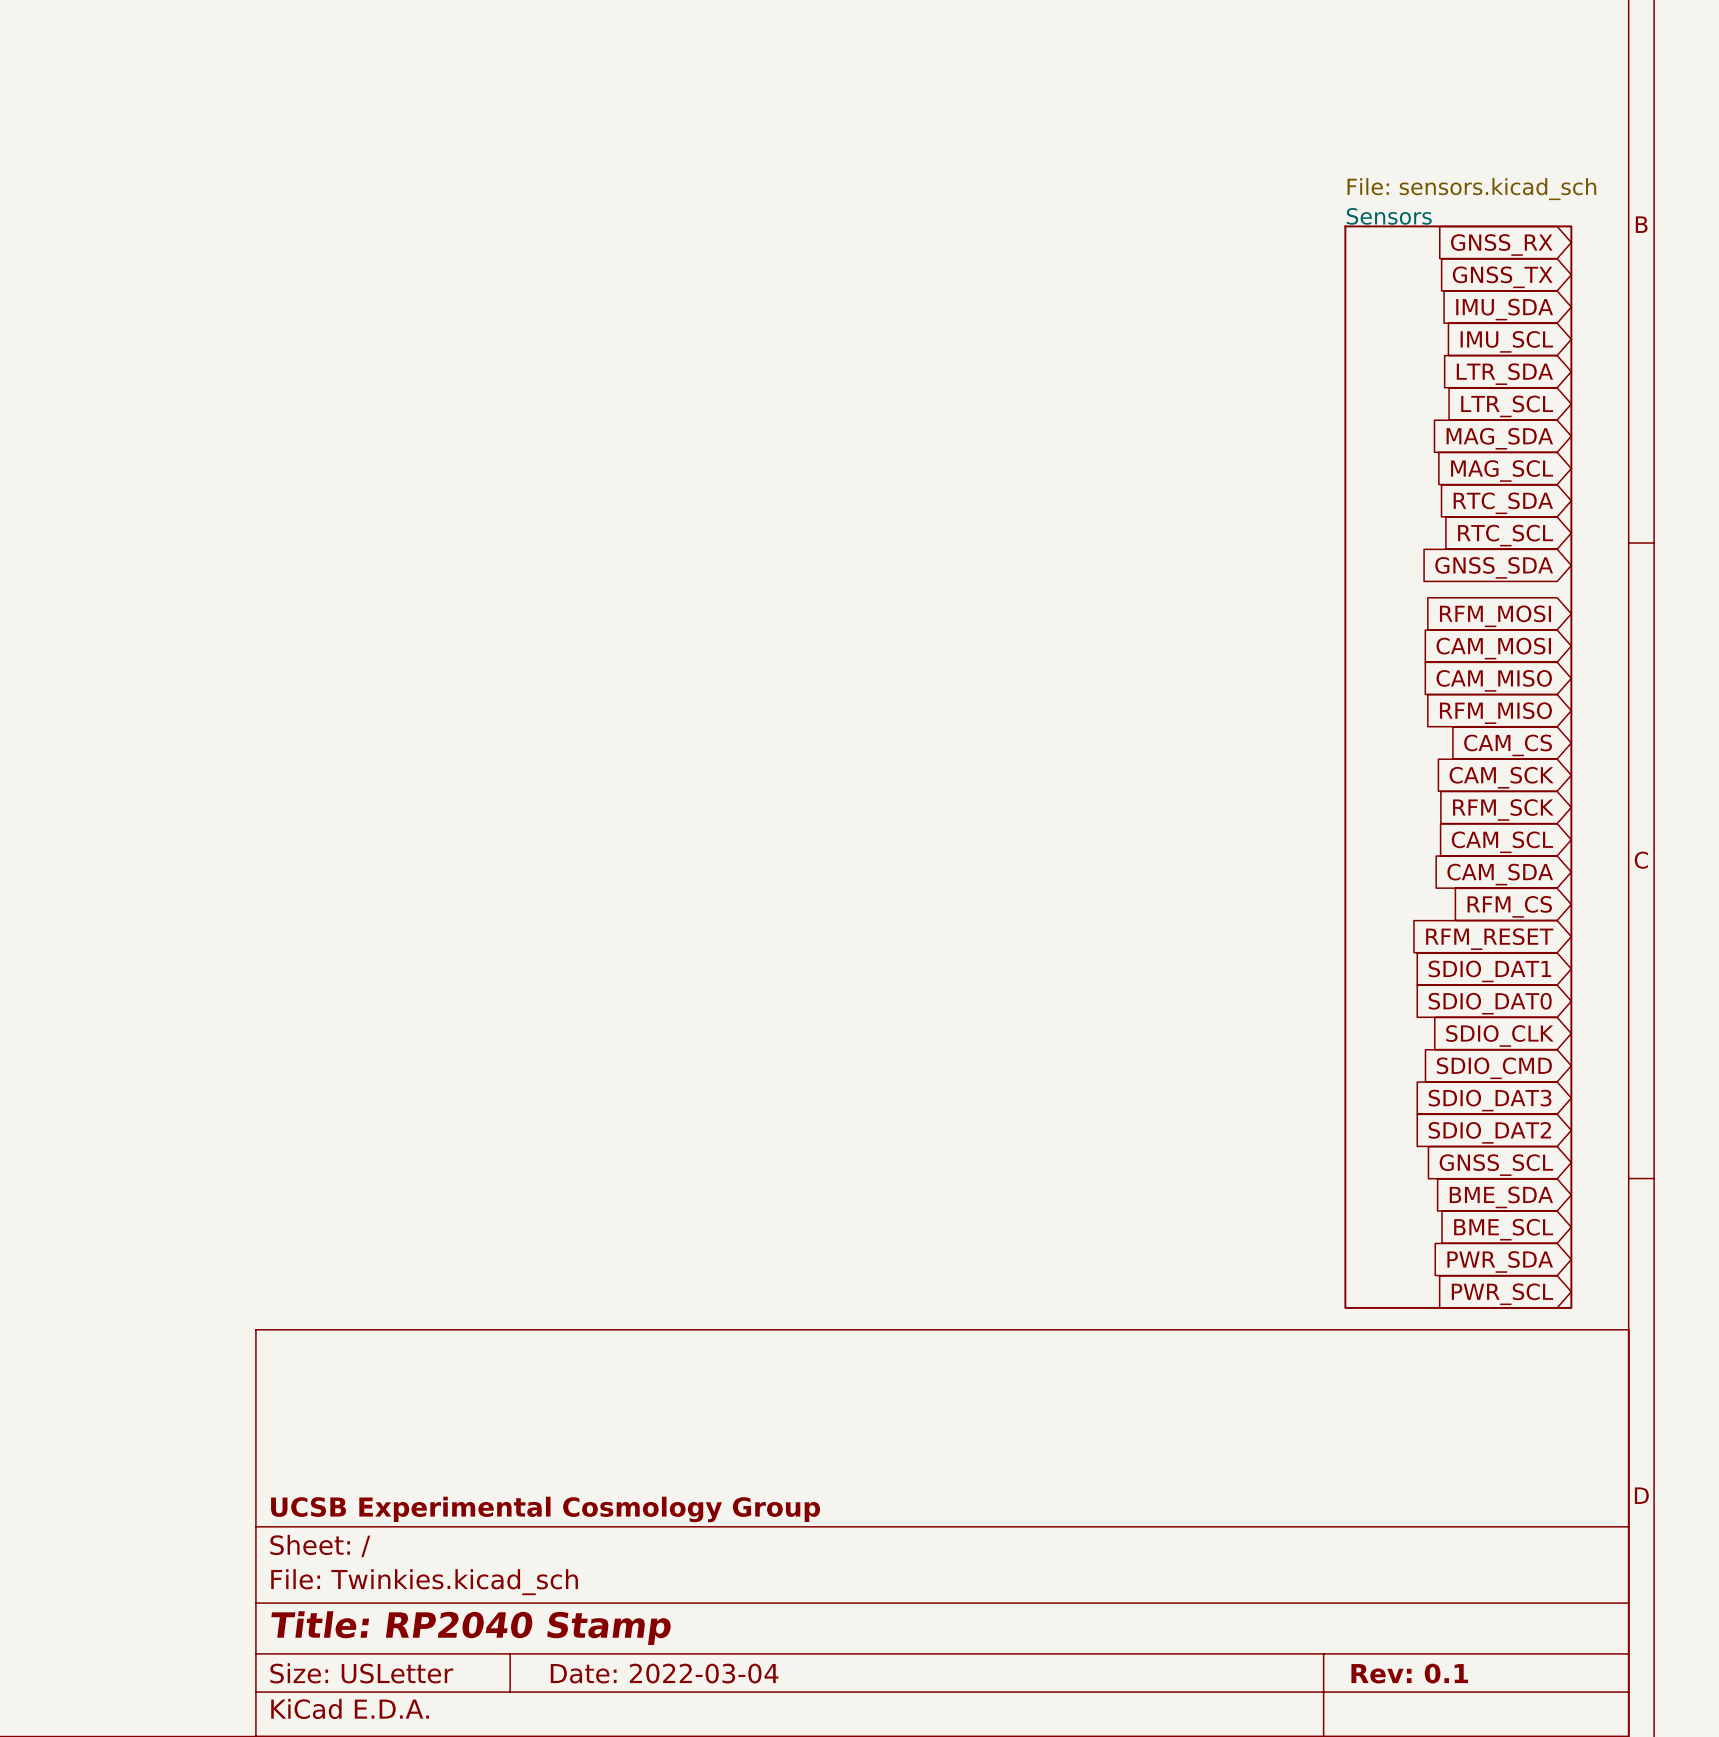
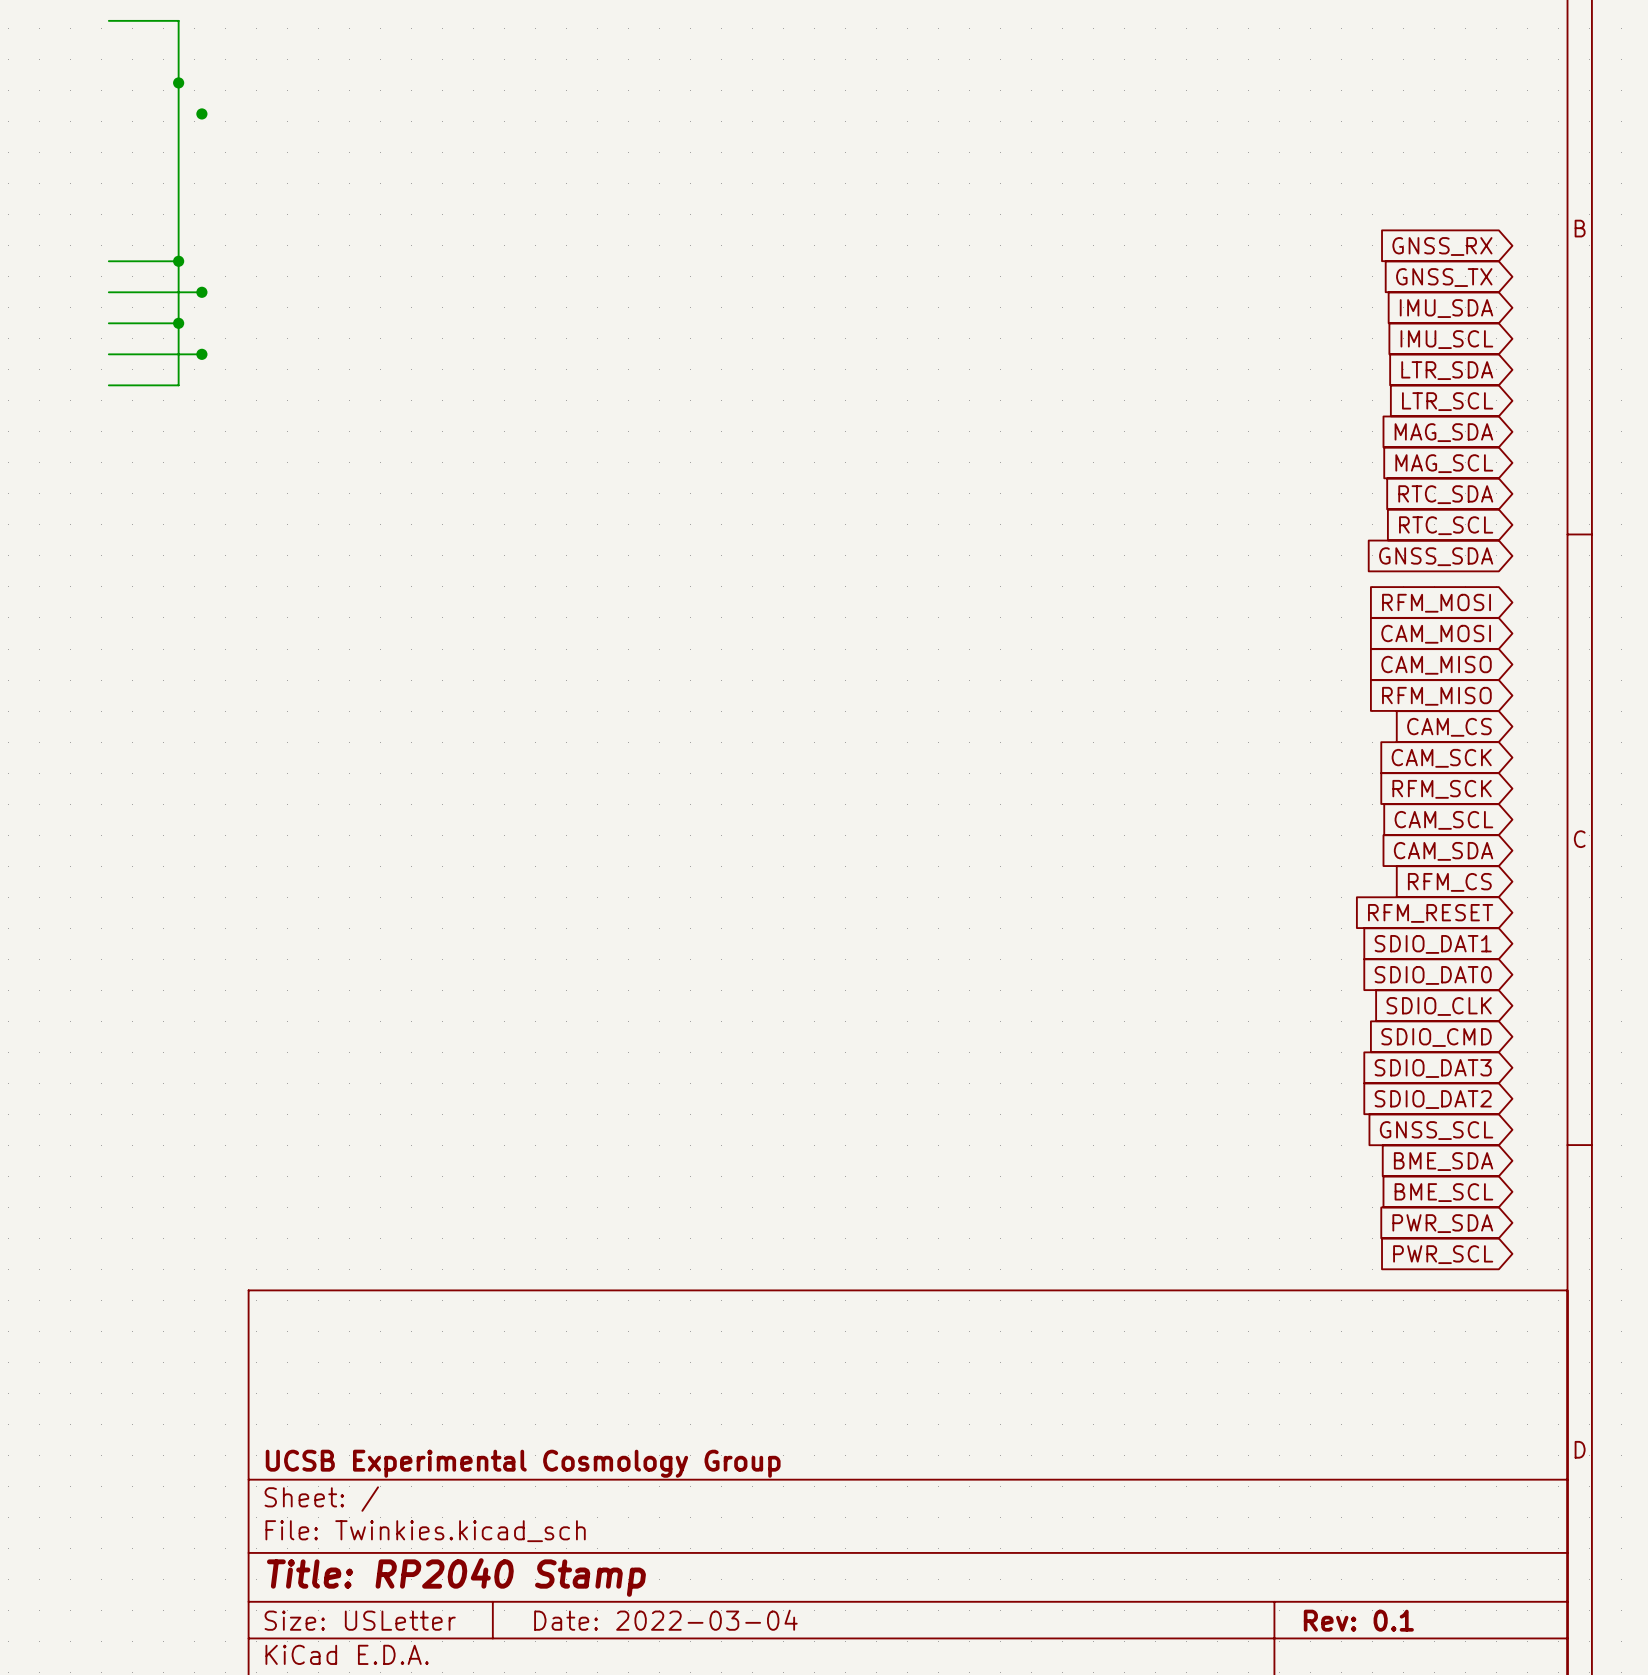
wire: none -> (108, 20) (178, 20) (178, 385) (108, 385)
junction: none -> (178, 82)
junction: none -> (201, 113)
wire: none -> (108, 261) (178, 261)
junction: none -> (178, 261)
wire: none -> (108, 292) (201, 292)
junction: none -> (201, 292)
wire: none -> (108, 323) (178, 323)
junction: none -> (178, 323)
wire: none -> (108, 354) (201, 354)
junction: none -> (201, 354)
sheet Sensors: File: sensors.kicad_sch (1458, 767) -> none

